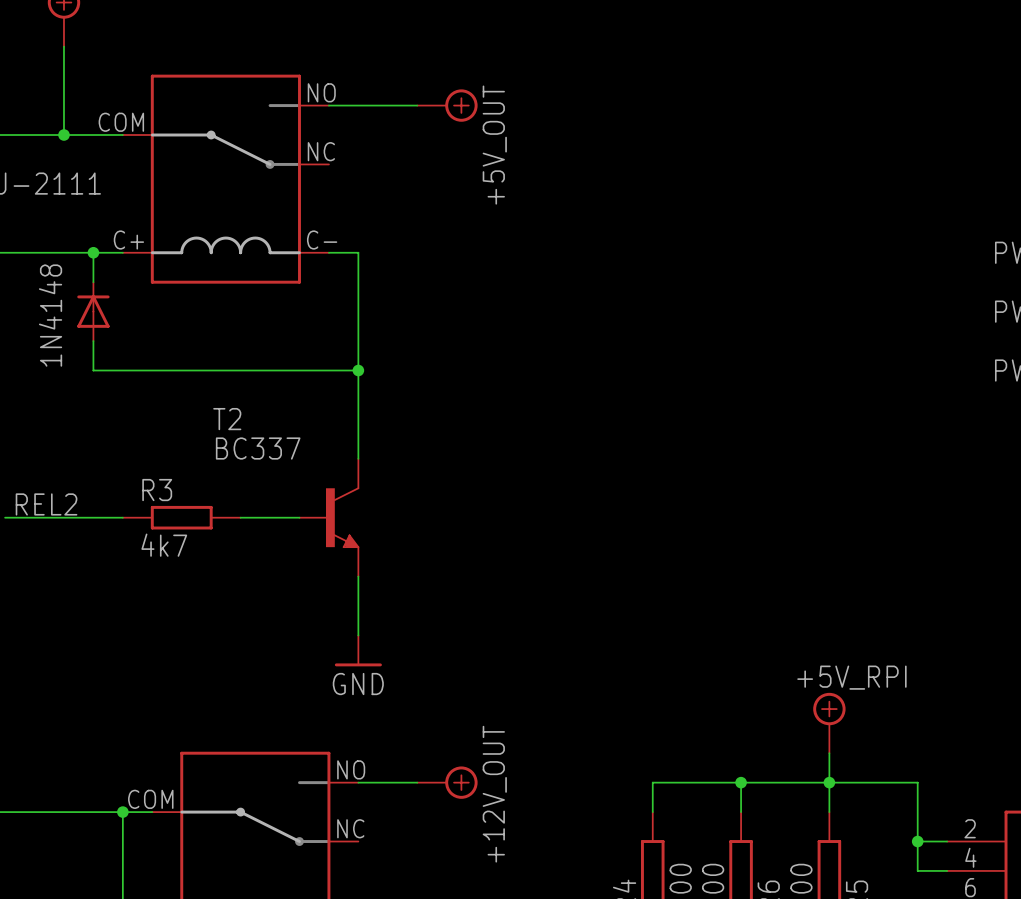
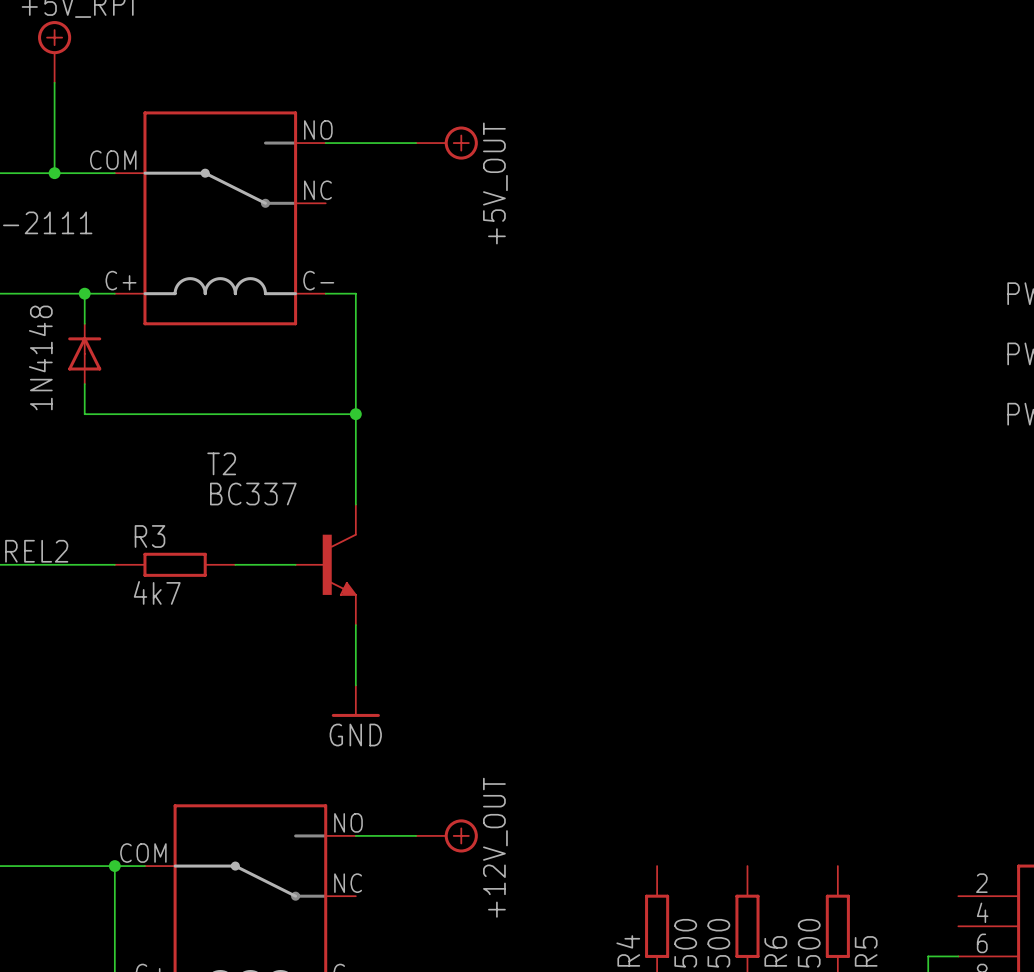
power symbol: +5V_RPI (829, 723) -> none
wire: (829, 753) (829, 812) -> none
wire: (741, 782) (741, 812) -> none
junction: (741, 782) -> none
junction: (829, 782) -> none
wire: (652, 812) (652, 782) (917, 782) (917, 870) (947, 870) -> none
wire: (917, 841) (947, 841) -> none
junction: (917, 841) -> none

